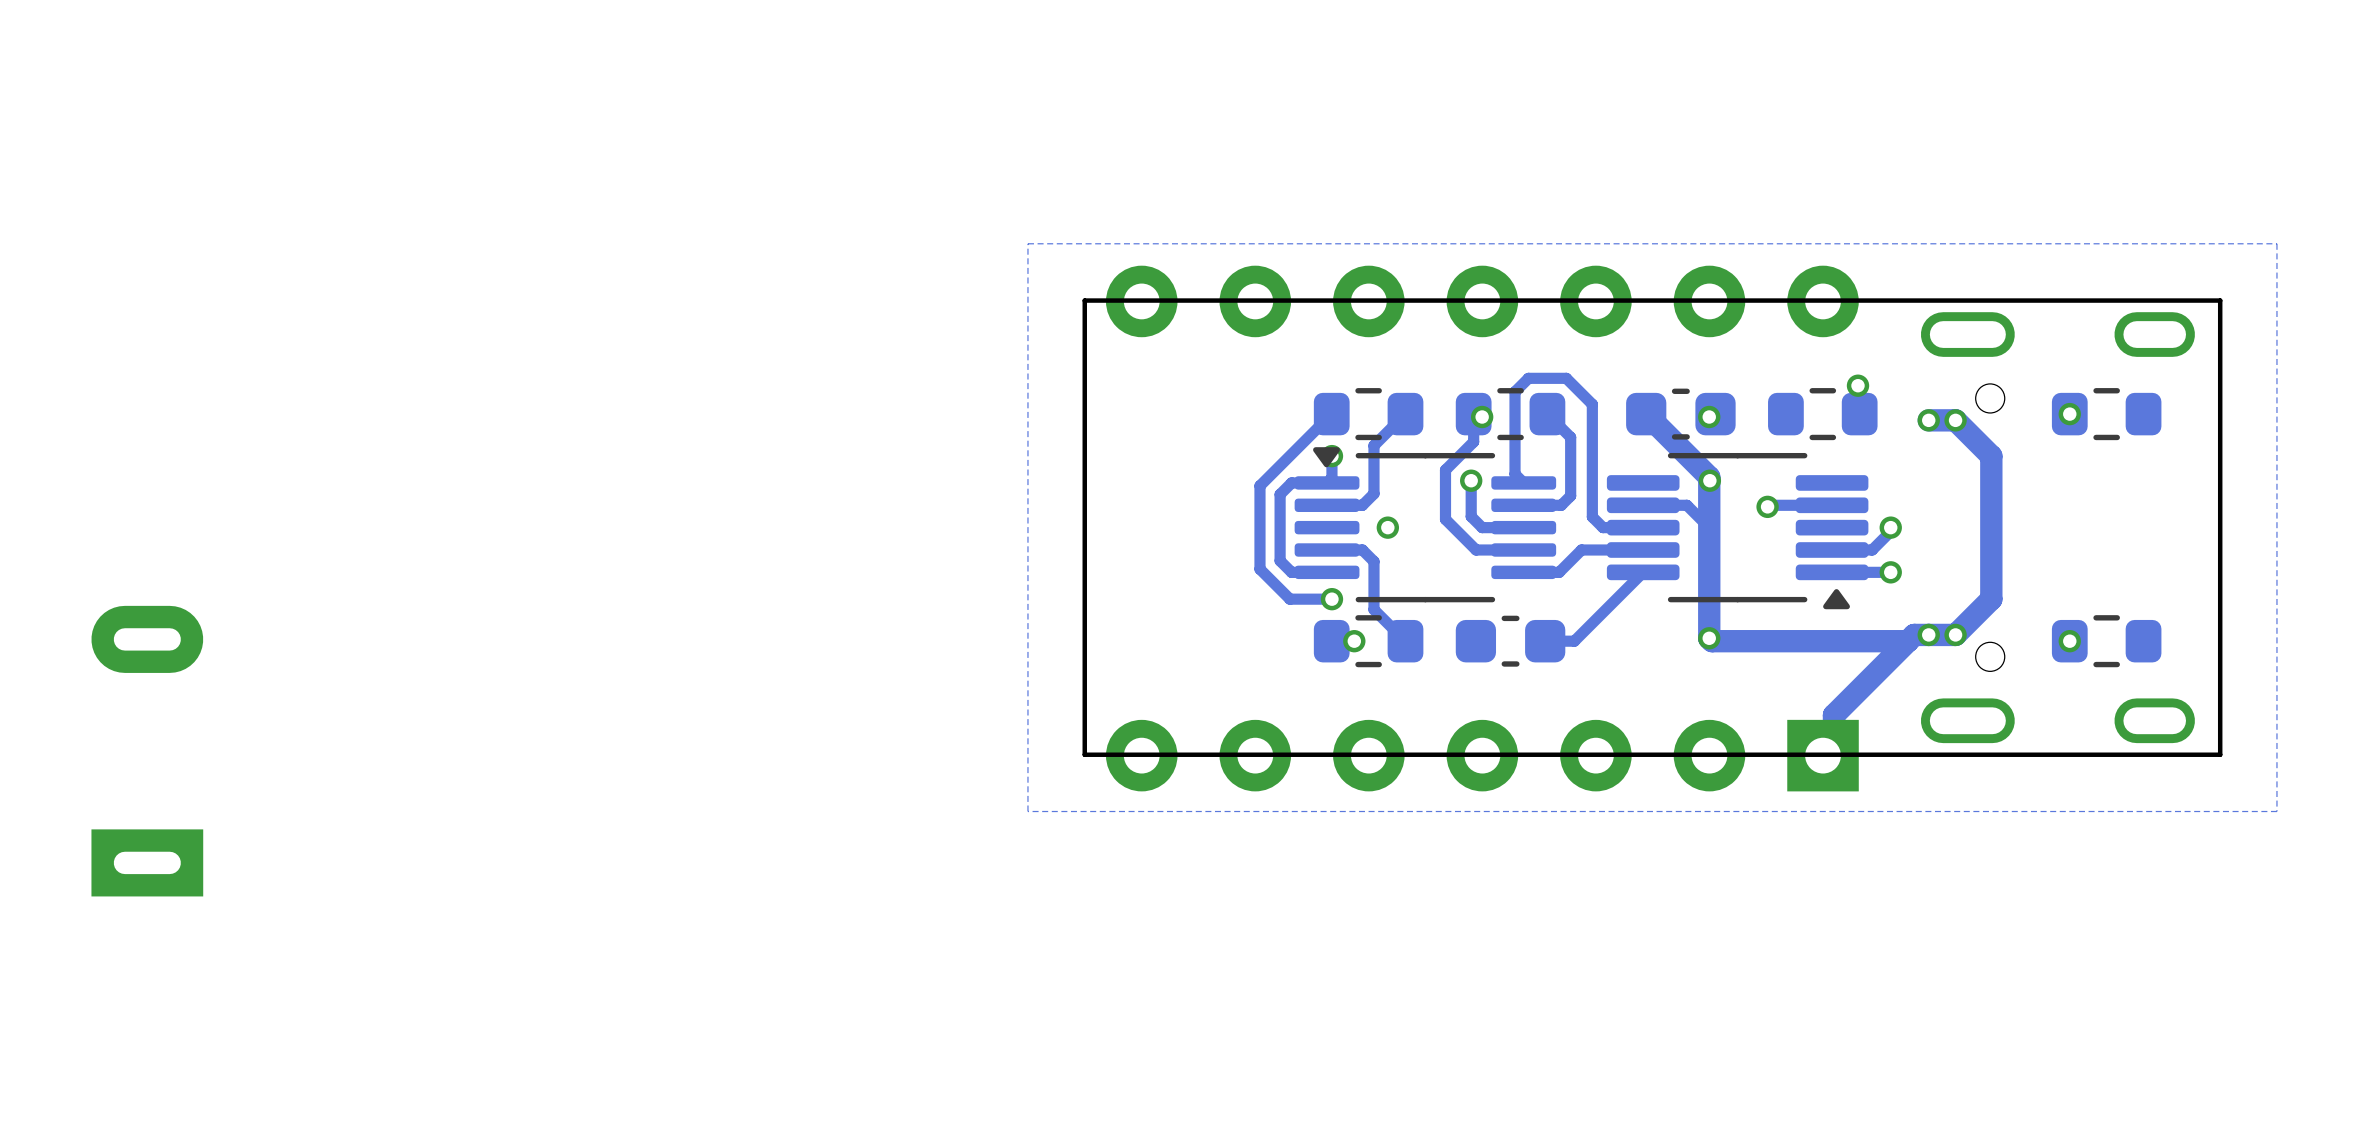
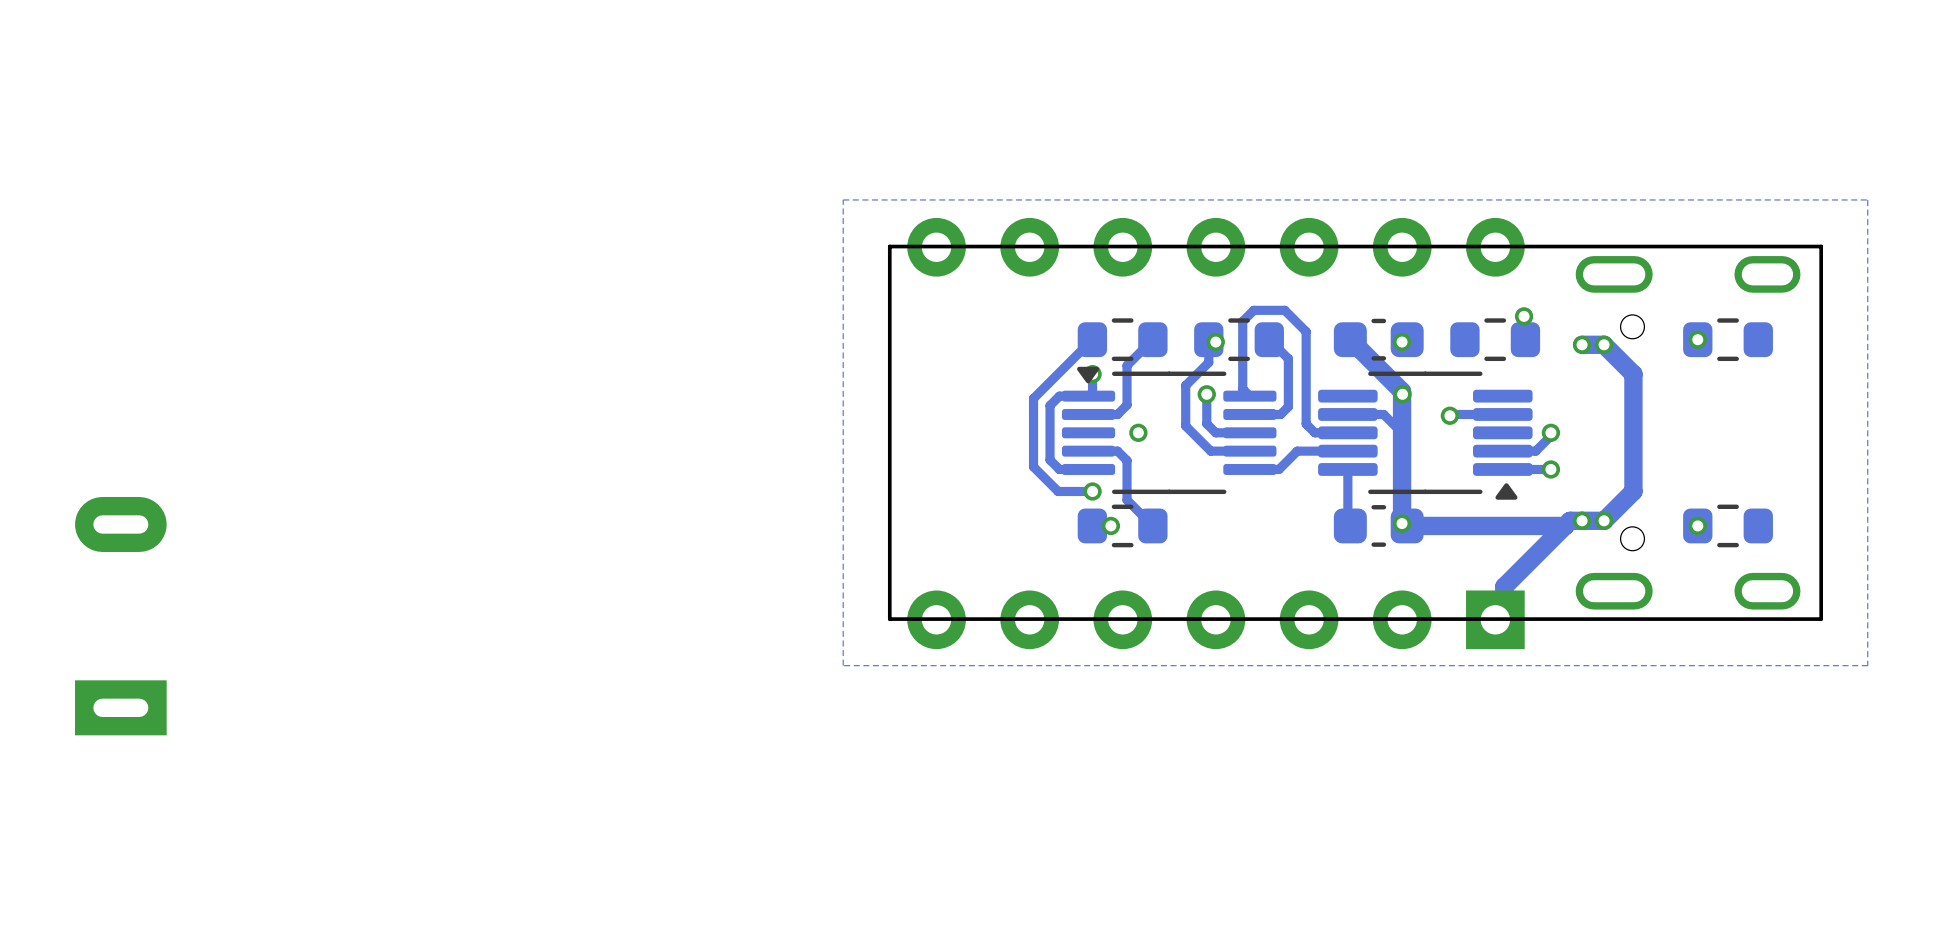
track: (1643, 572) (1574, 641) (1545, 641) -> (1347, 469) (1347, 523) (1350, 525)
part position: (1510, 641) -> (1378, 525)

